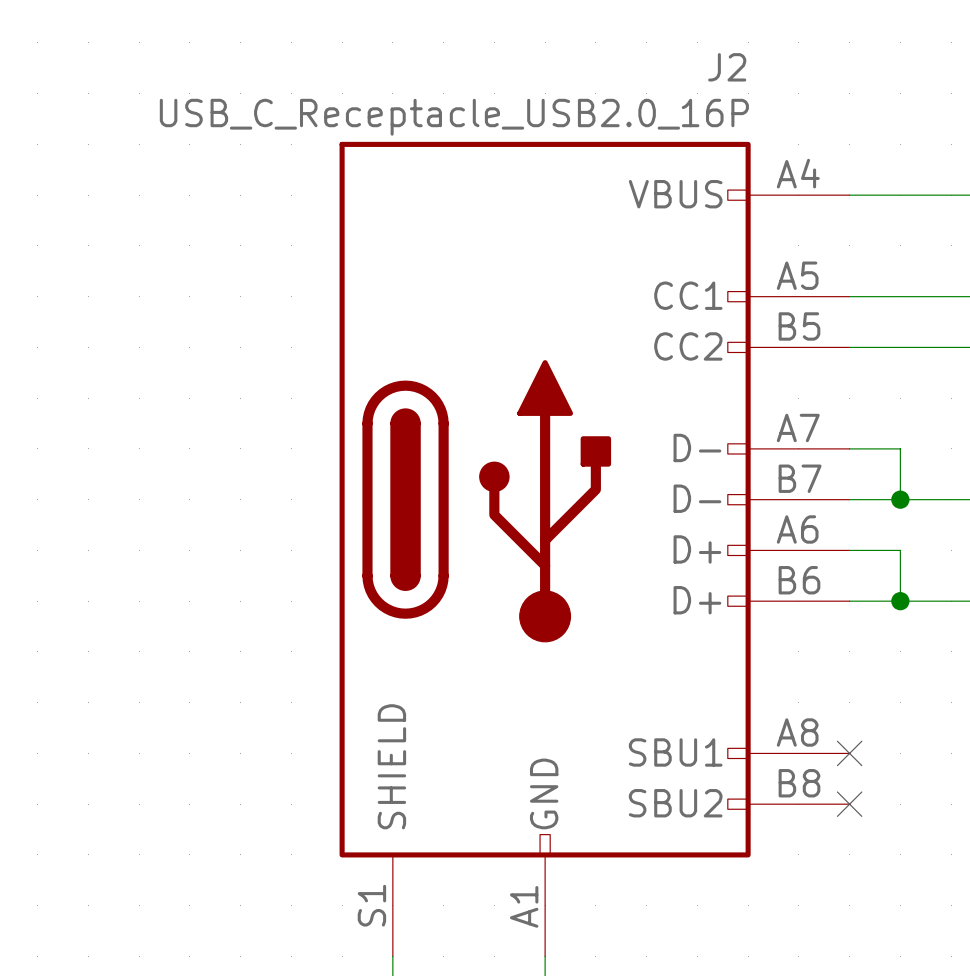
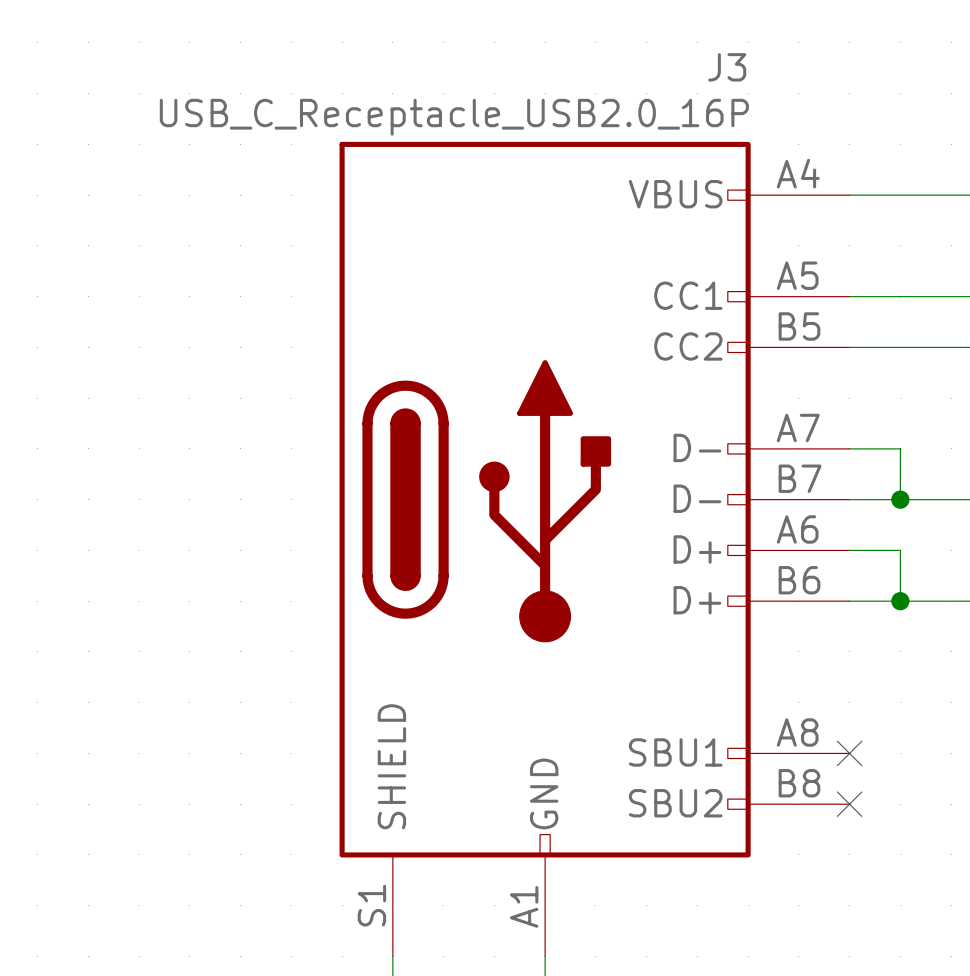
J2 name: J2 (727, 67) -> J3 (727, 67)

